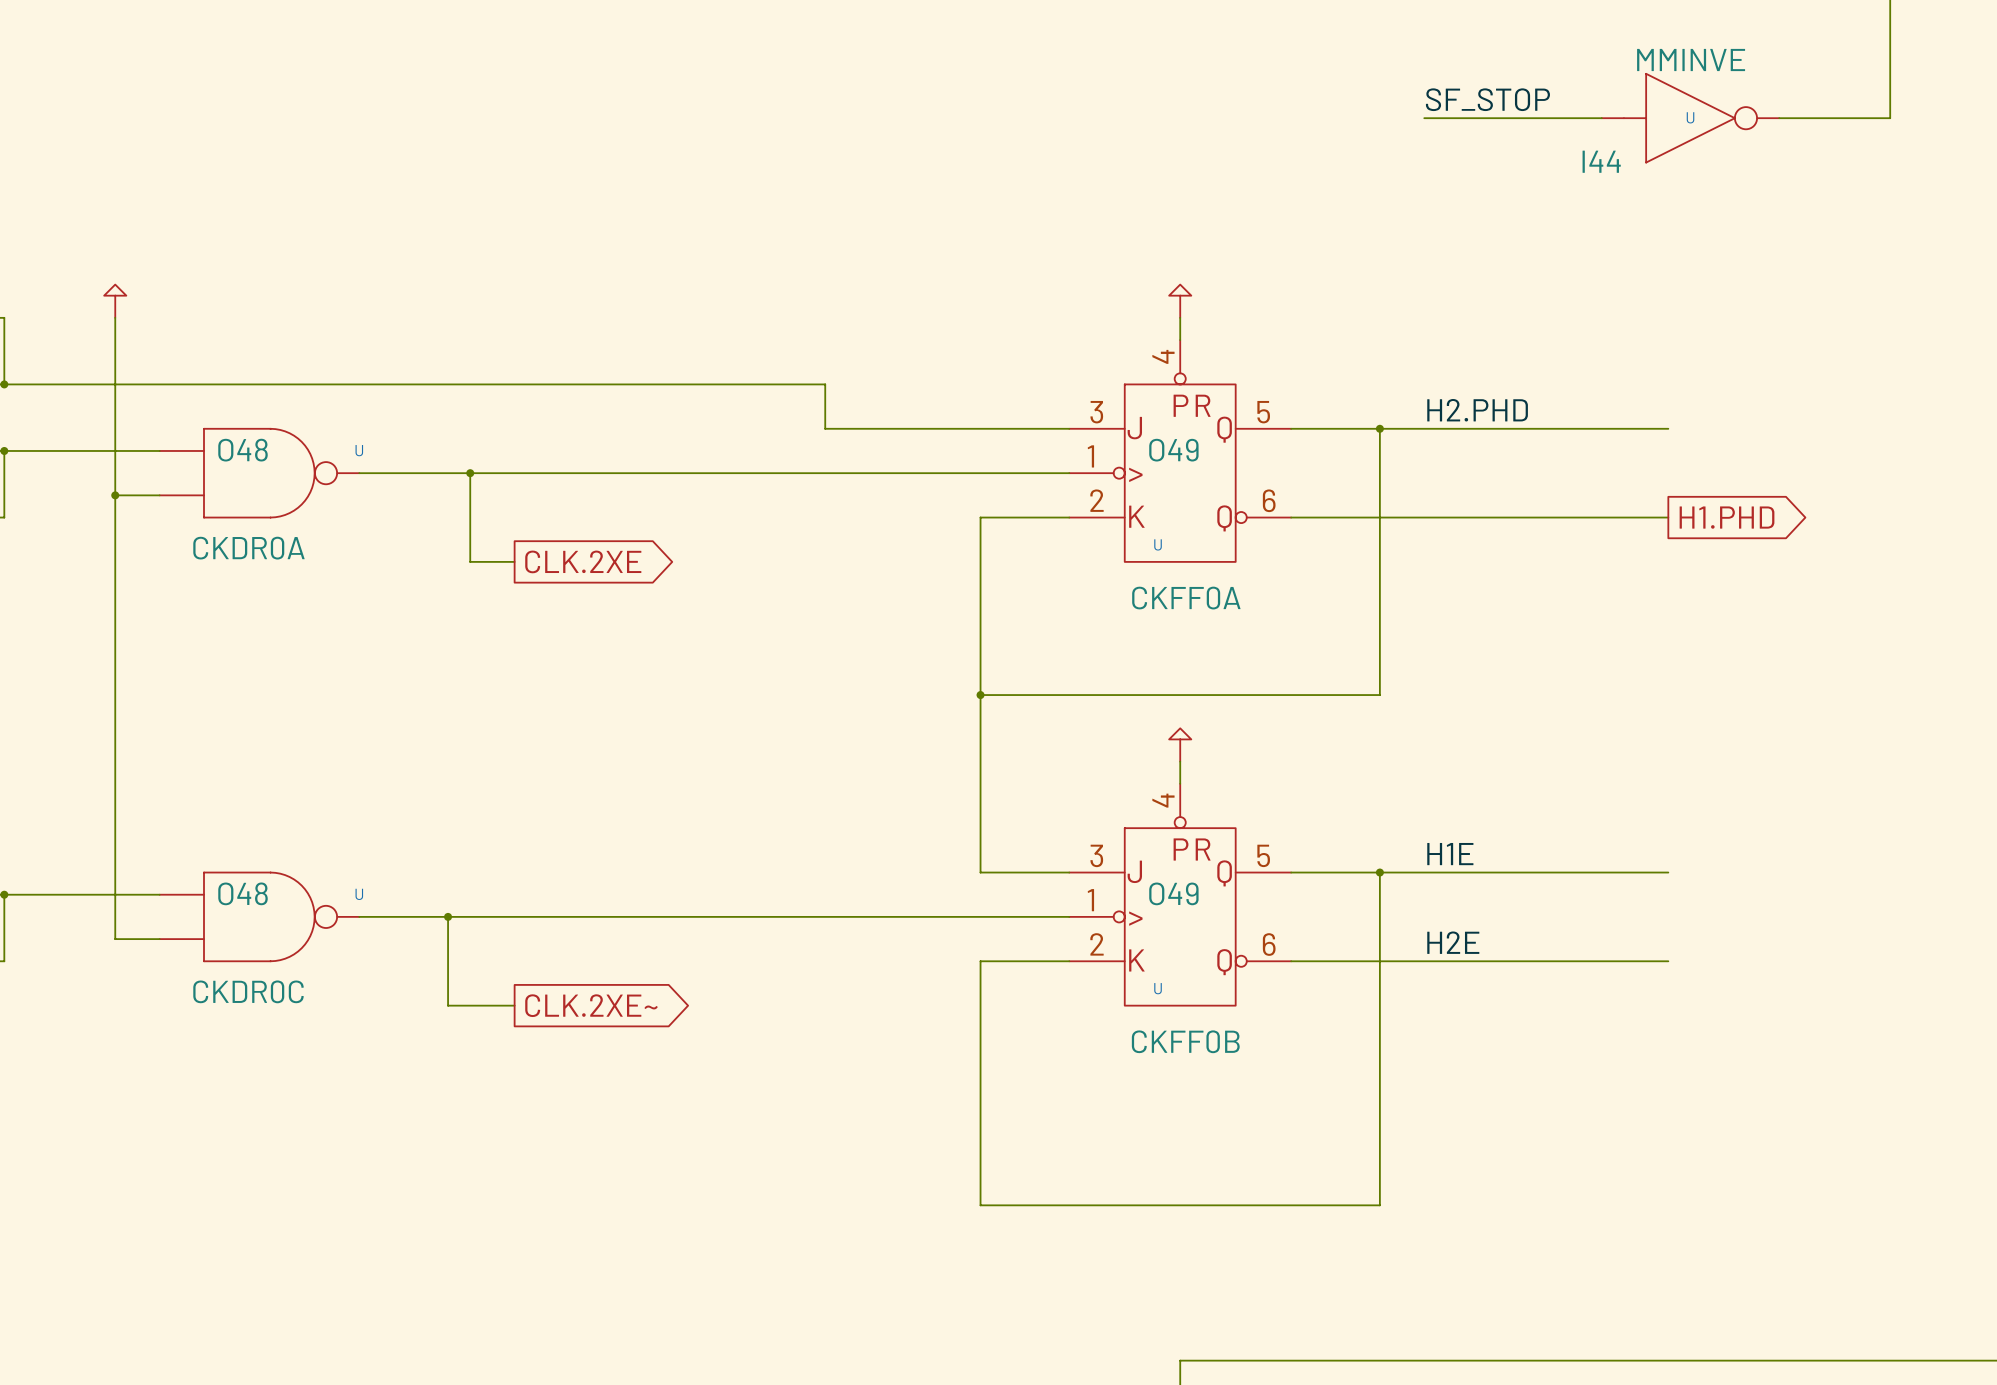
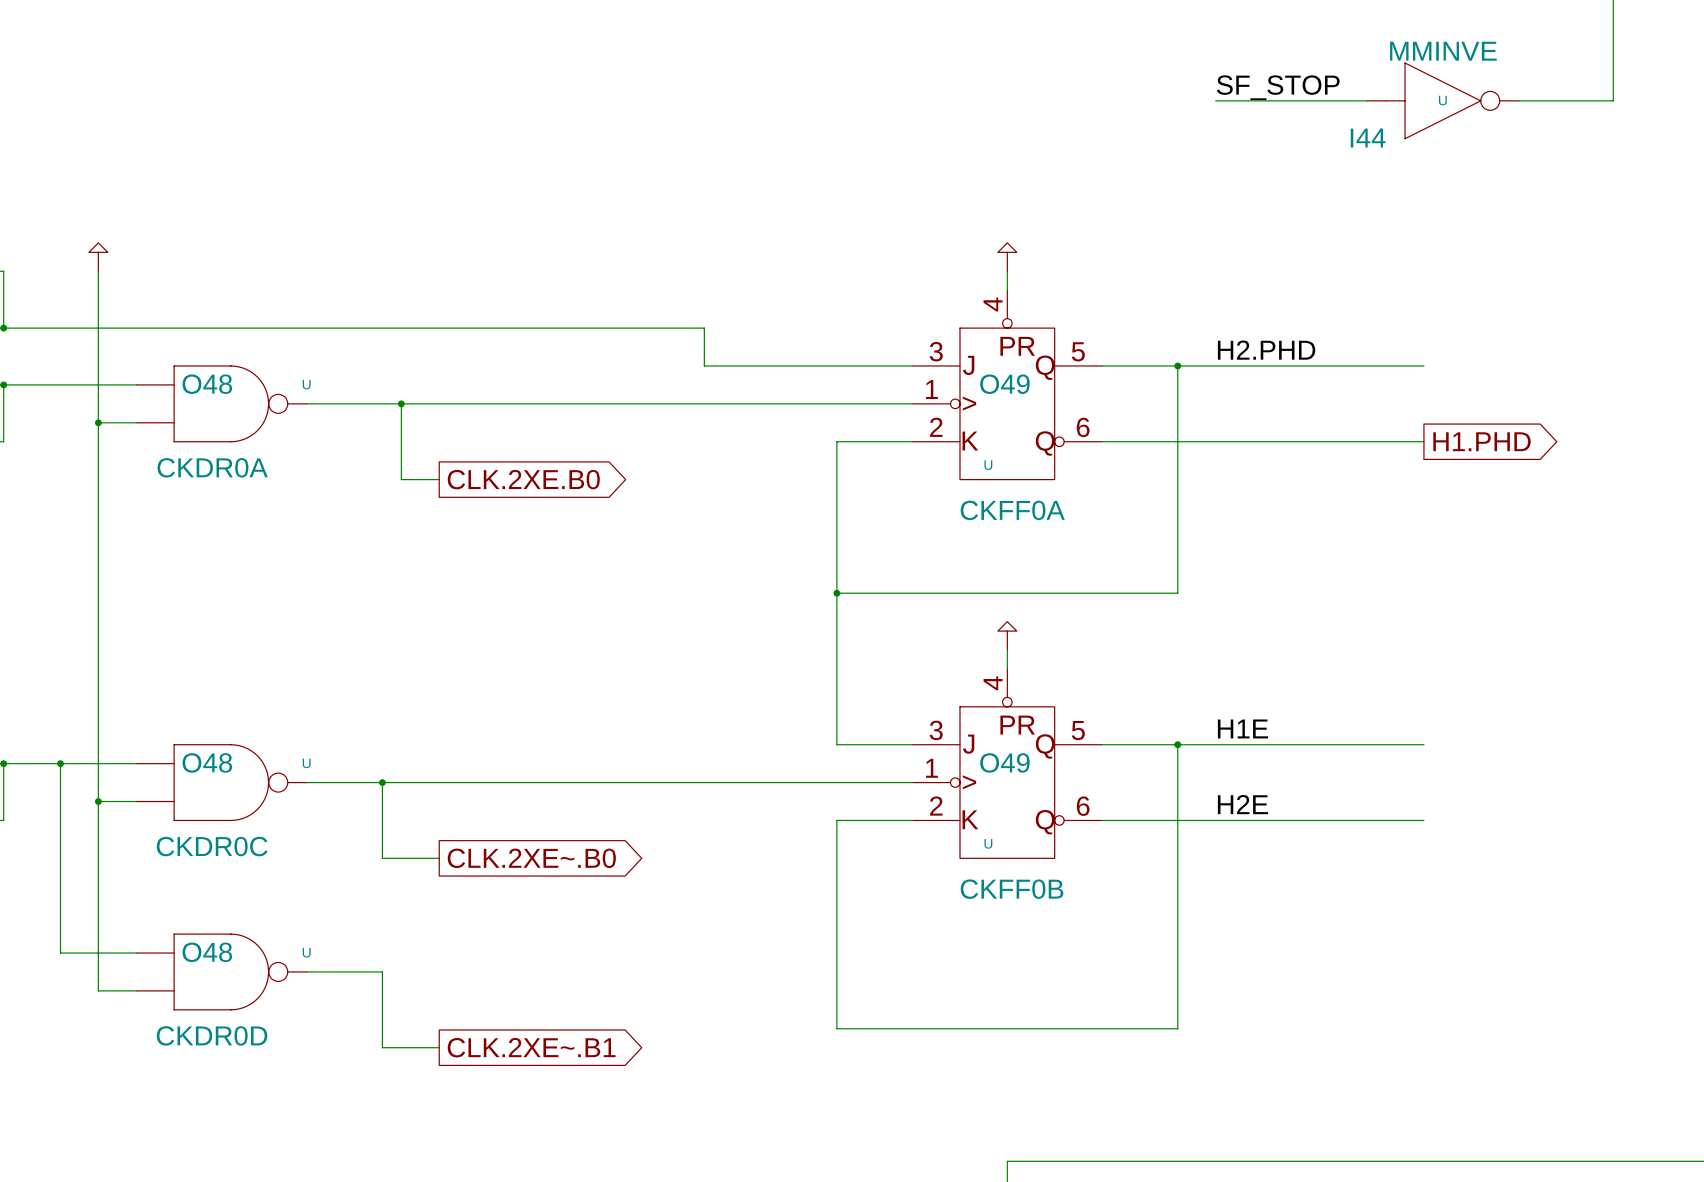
global label: CLK.2XE (583, 561) -> CLK.2XE.B0 (523, 479)
wire: none -> (60, 763) (60, 953) (136, 953)
junction: none -> (60, 763)
wire: none -> (98, 801) (98, 990) (136, 990)
junction: none -> (98, 801)
global label: CLK.2XE~ (591, 1005) -> CLK.2XE~.B0 (531, 858)
U: none -> (221, 971)
wire: none -> (306, 971) (382, 971) (382, 1047) (439, 1047)
global label: none -> CLK.2XE~.B1 (531, 1047)

